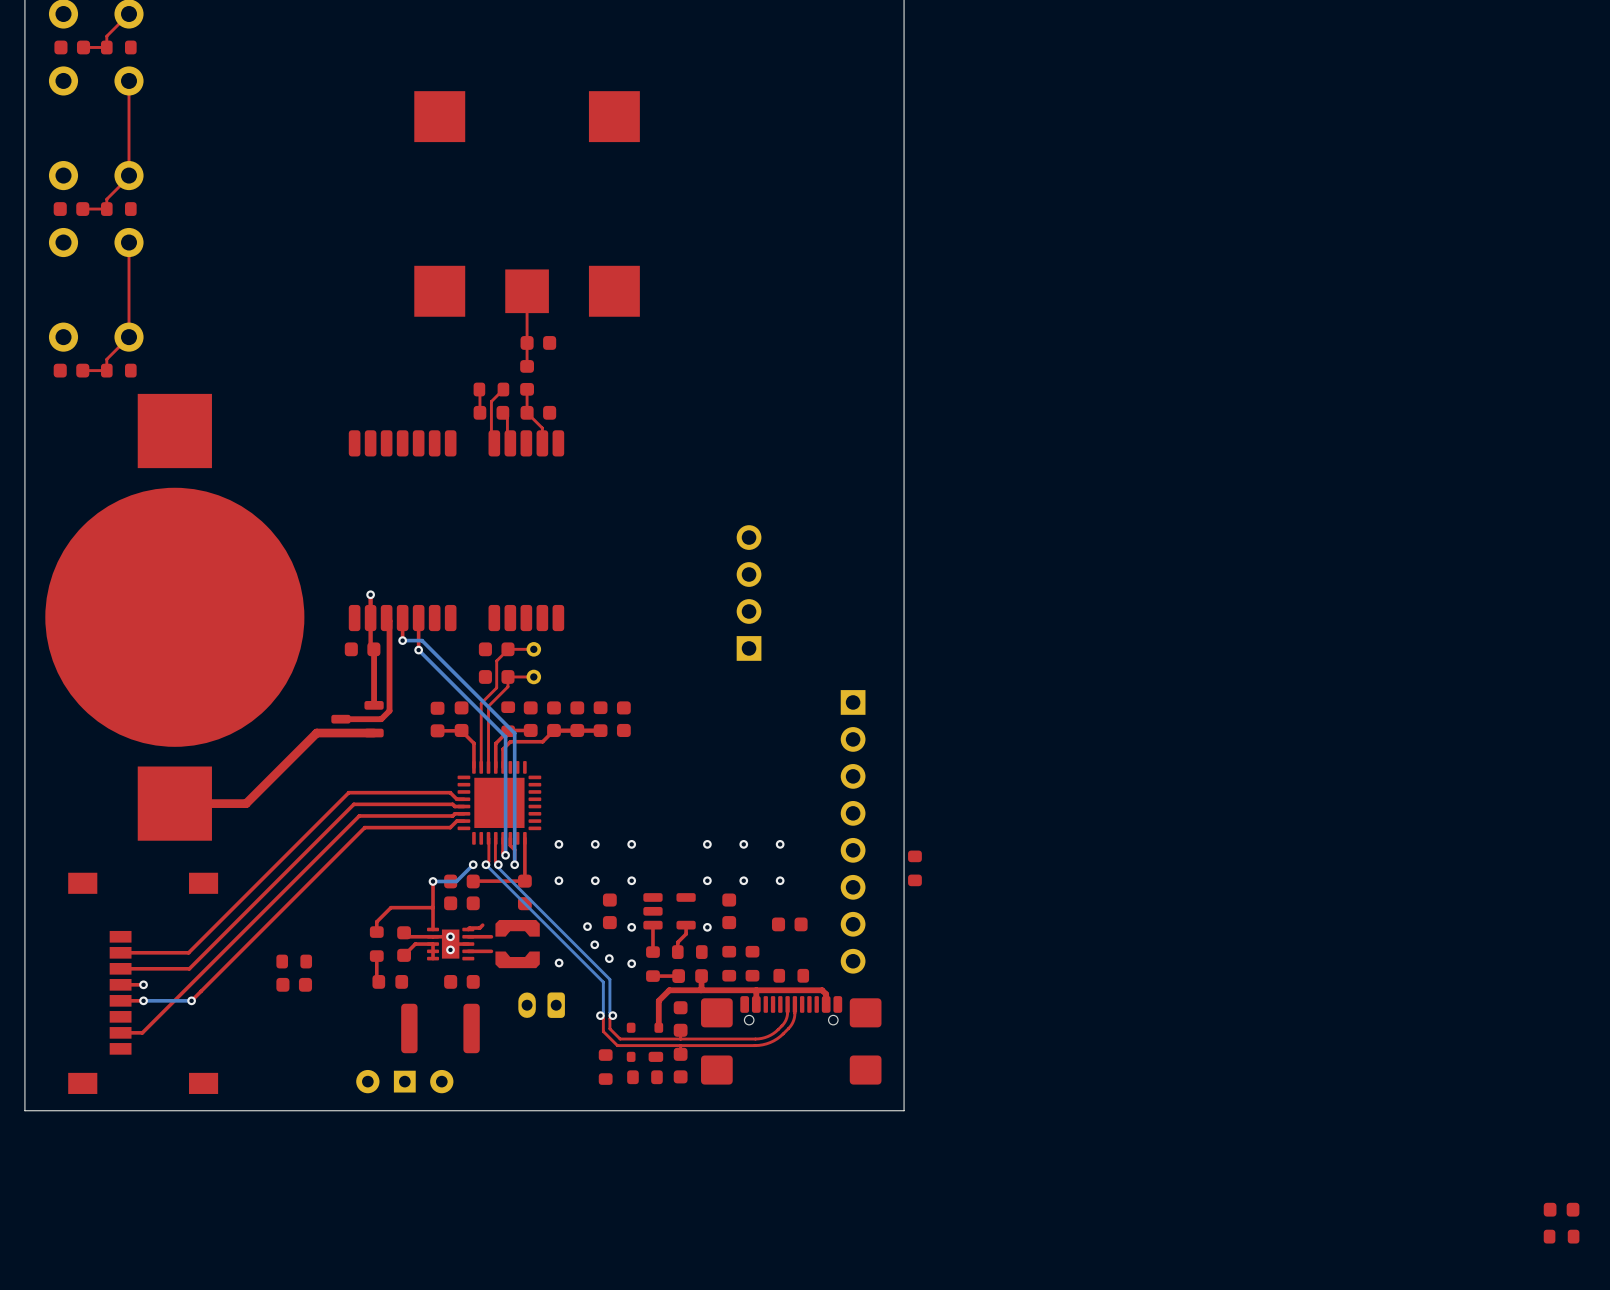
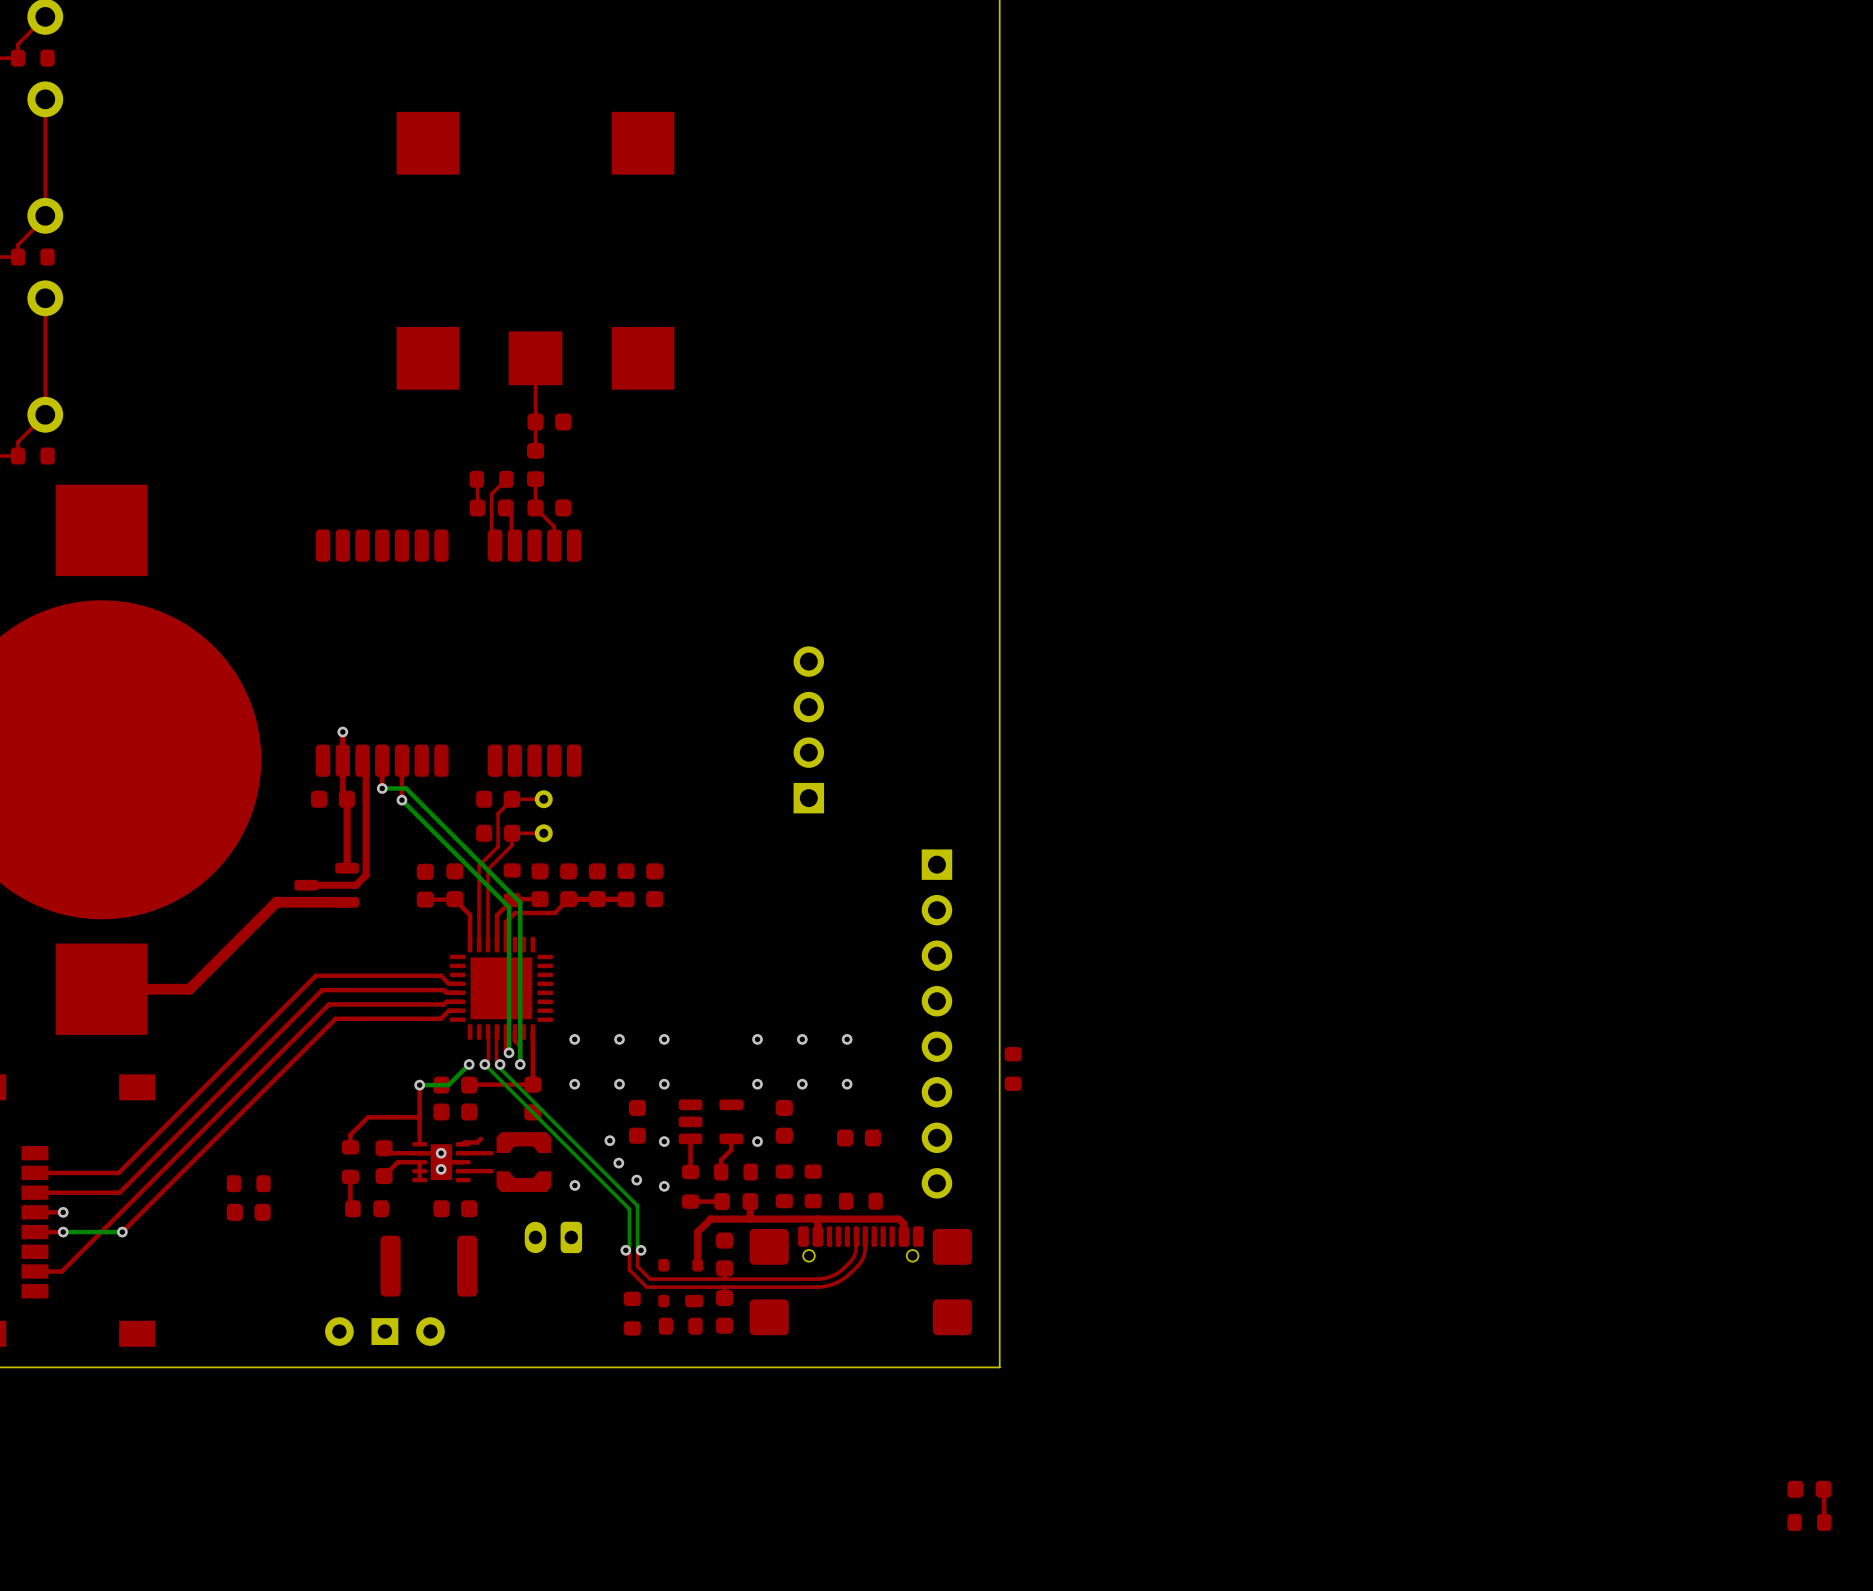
top track: none -> (1826, 1489) (1824, 1491) (1824, 1522)

